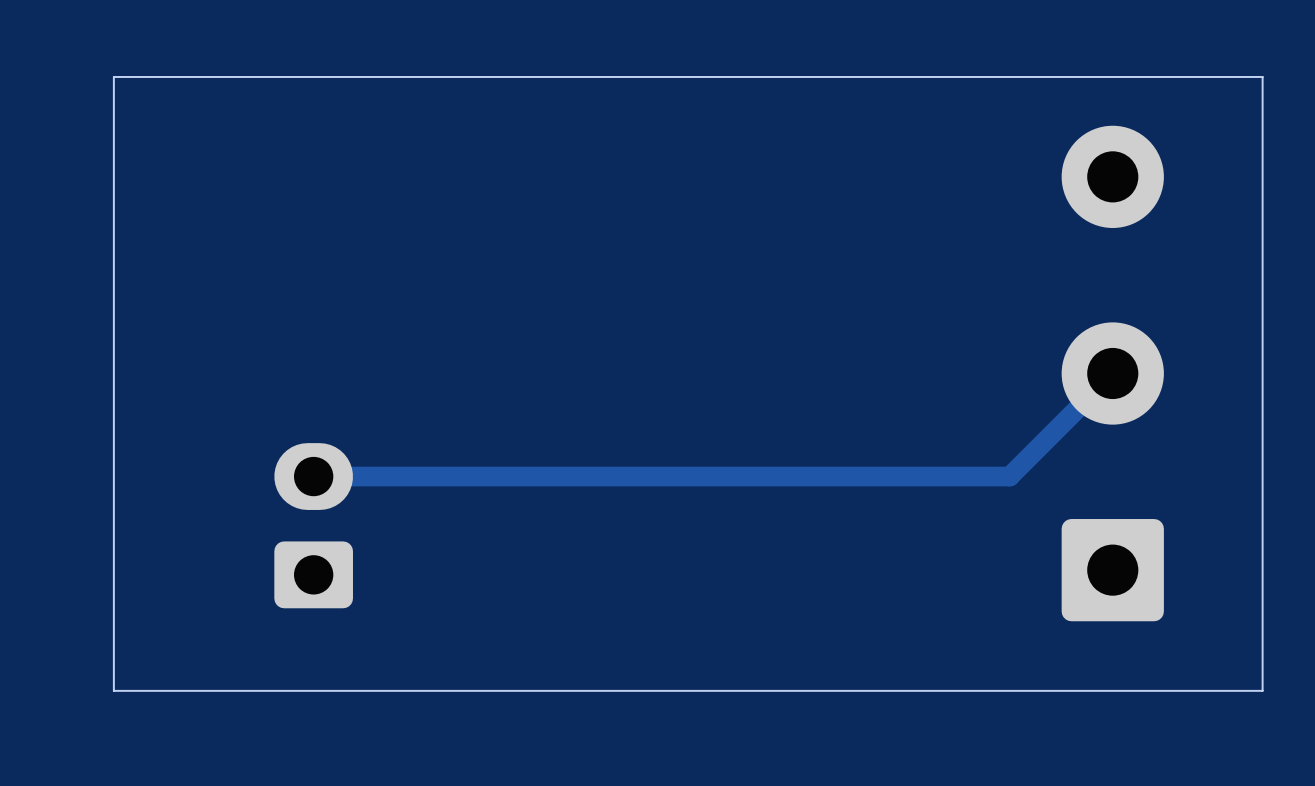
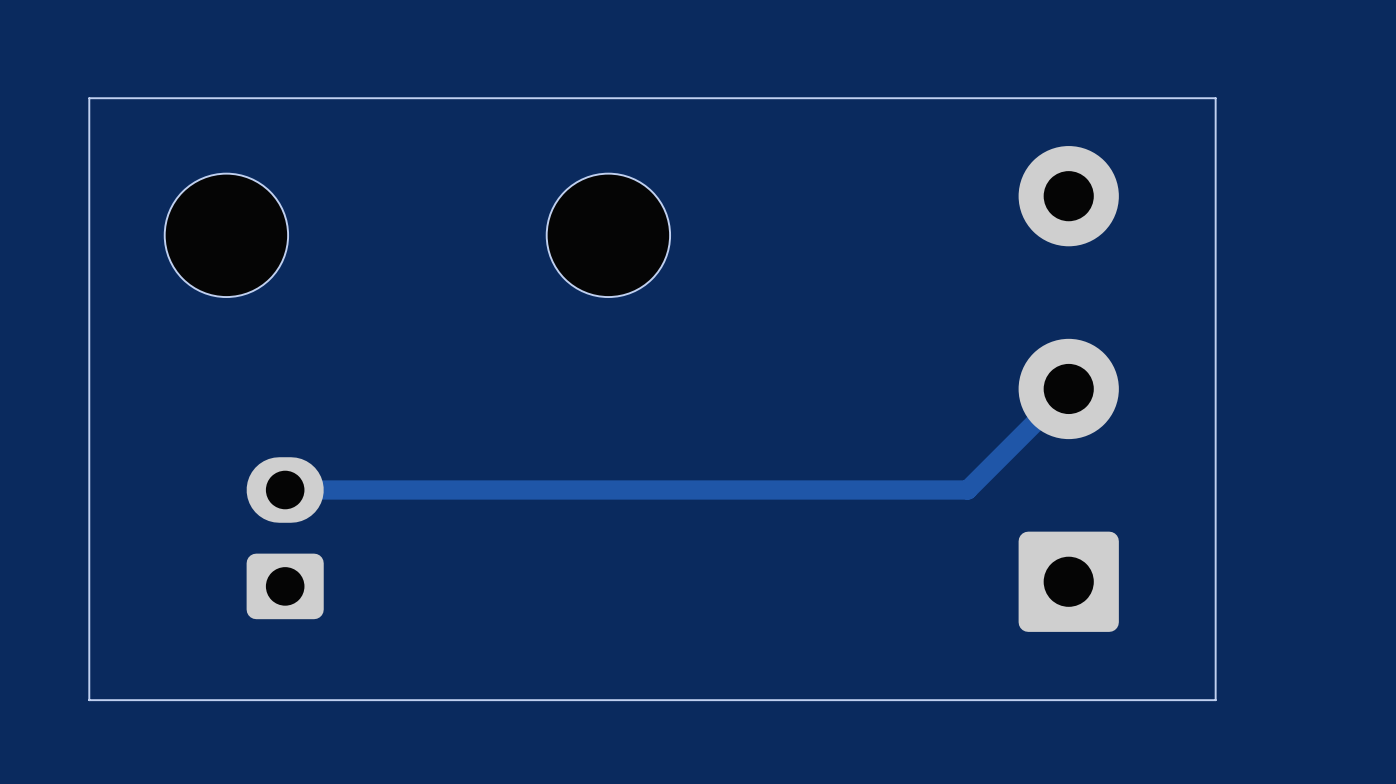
part: none -> (226, 235)
part: none -> (608, 235)

